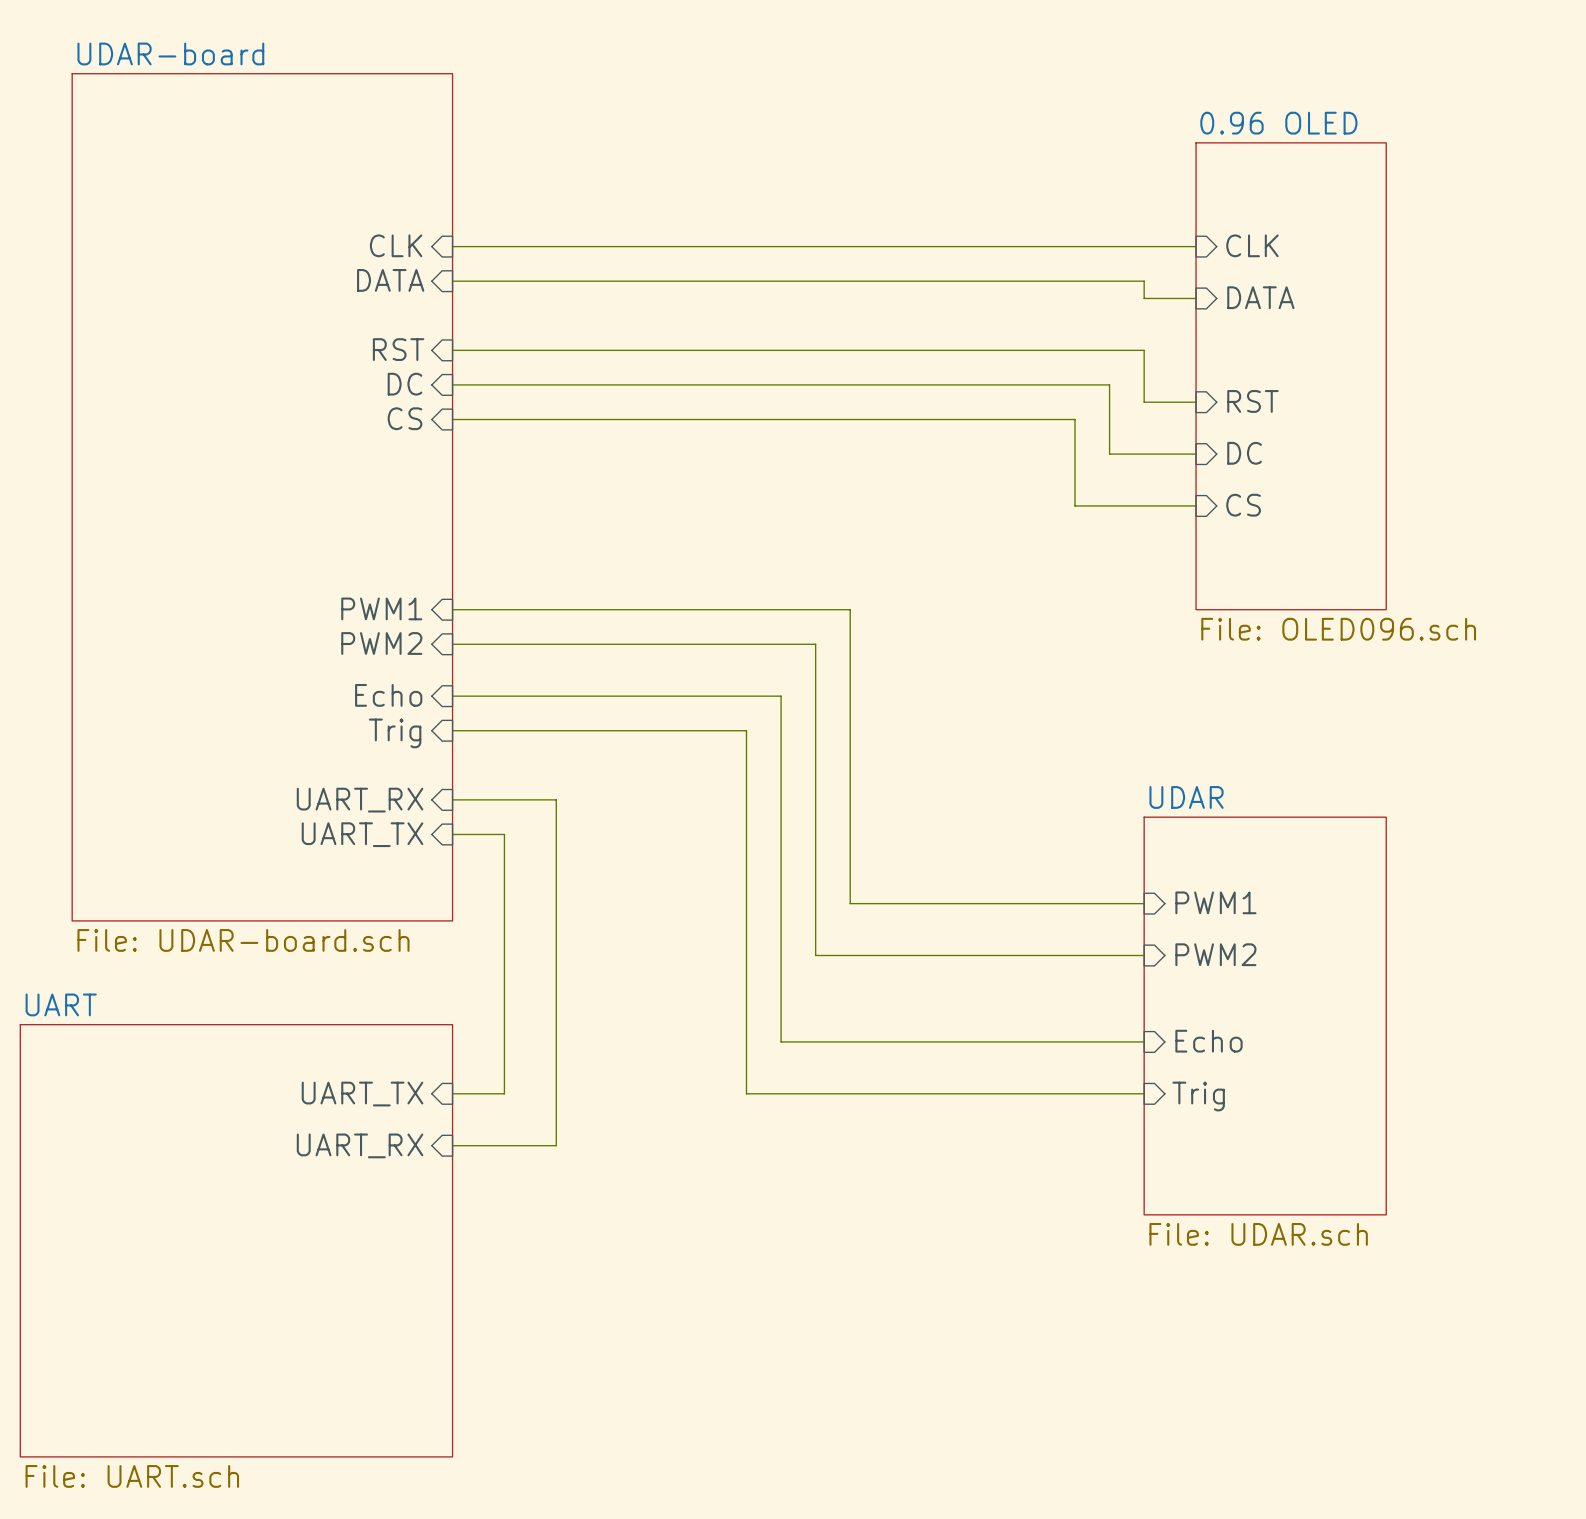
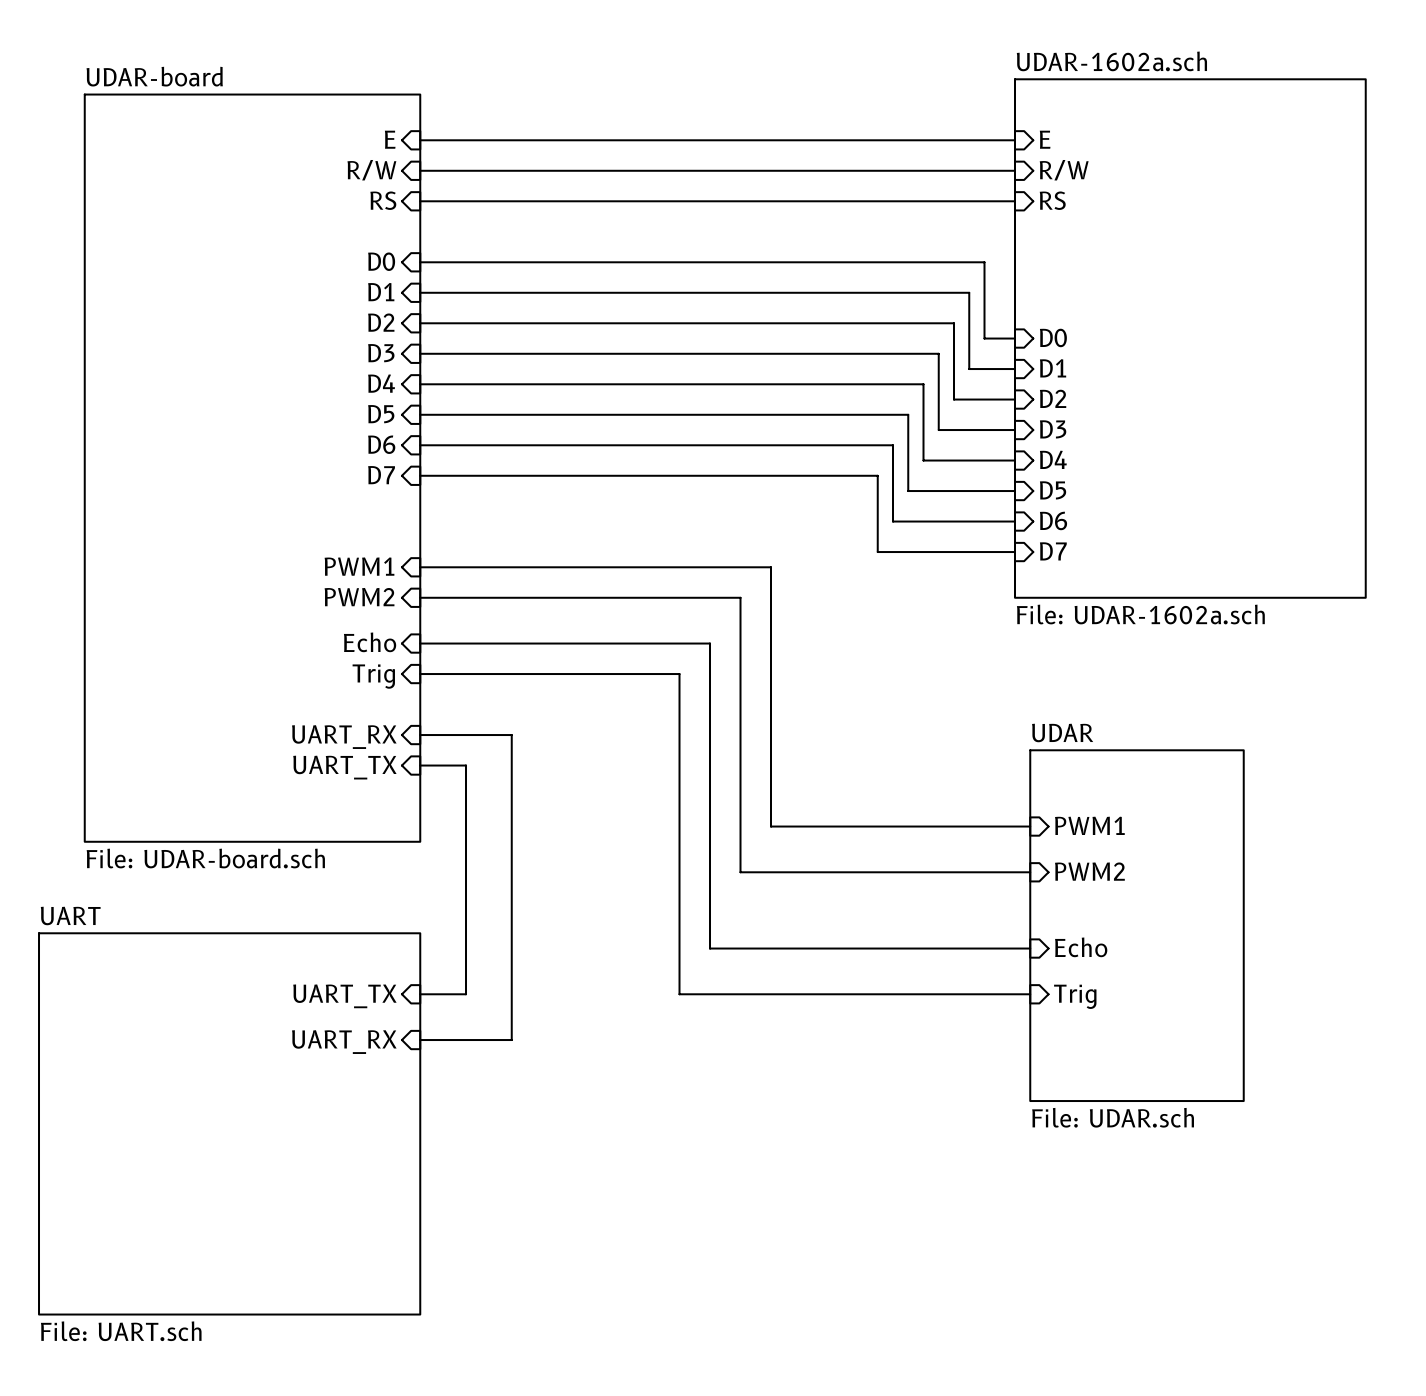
sheet pin: none -> E (390, 139)
sheet pin: none -> E (1045, 139)
wire: none -> (420, 140) (1015, 140)
wire: none -> (420, 170) (1015, 170)
sheet pin: none -> R/W (371, 170)
sheet pin: none -> R/W (1064, 170)
sheet pin: none -> RS (383, 200)
sheet pin: none -> RS (1052, 200)
wire: none -> (420, 201) (1015, 201)
sheet pin: CLK (396, 245) -> none
sheet pin: CLK (1252, 245) -> none
wire: (452, 246) (1196, 246) -> none
sheet pin: none -> D0 (381, 261)
sheet pin: DATA (390, 280) -> none
wire: (452, 281) (1144, 281) (1144, 298) (1196, 298) -> none
sheet pin: none -> D1 (381, 292)
sheet pin: DATA (1260, 297) -> none
sheet pin: none -> D2 (381, 322)
sheet pin: RST (398, 349) -> none
sheet pin: none -> D0 (1053, 337)
wire: (452, 350) (1092, 350) -> (420, 262) (984, 262) (984, 338)
wire: (1126, 350) (1144, 350) (1144, 402) (1196, 402) -> none
sheet UDAR-1602a.sch: none -> File: UDAR-1602a.sch (1190, 338)
sheet pin: none -> D3 (381, 353)
wire: none -> (420, 353) (938, 353) (938, 430) (999, 430)
sheet 0.96 OLED: File: OLED096.sch (1291, 376) -> none
sheet pin: DC (405, 384) -> none
wire: (452, 384) (1075, 384) -> (420, 292) (969, 292) (969, 369)
wire: (1109, 384) (1109, 454) -> (999, 369) (1015, 369)
sheet pin: none -> D1 (1053, 368)
sheet pin: none -> D4 (381, 383)
sheet pin: RST (1252, 401) -> none
wire: none -> (420, 384) (923, 384) (923, 460) (1015, 460)
sheet pin: CS (405, 418) -> none
sheet pin: none -> D2 (1053, 398)
wire: (452, 419) (1057, 419) -> (420, 323) (954, 323) (954, 399)
wire: (1075, 419) (1075, 505) (1196, 505) -> (969, 399) (1015, 399)
sheet pin: none -> D5 (381, 414)
wire: none -> (420, 414) (908, 414) (908, 491) (1015, 491)
sheet pin: none -> D3 (1053, 429)
sheet pin: DC (1244, 453) -> none
wire: (1126, 454) (1196, 454) -> none
sheet pin: none -> D6 (381, 444)
wire: none -> (420, 445) (893, 445) (893, 521) (1015, 521)
sheet pin: none -> D4 (1053, 459)
sheet pin: none -> D7 (381, 475)
wire: none -> (420, 475) (877, 475) (877, 552) (1015, 552)
sheet pin: CS (1243, 505) -> none
sheet pin: none -> D5 (1053, 490)
sheet pin: none -> D6 (1053, 520)
sheet pin: none -> D7 (1053, 551)

